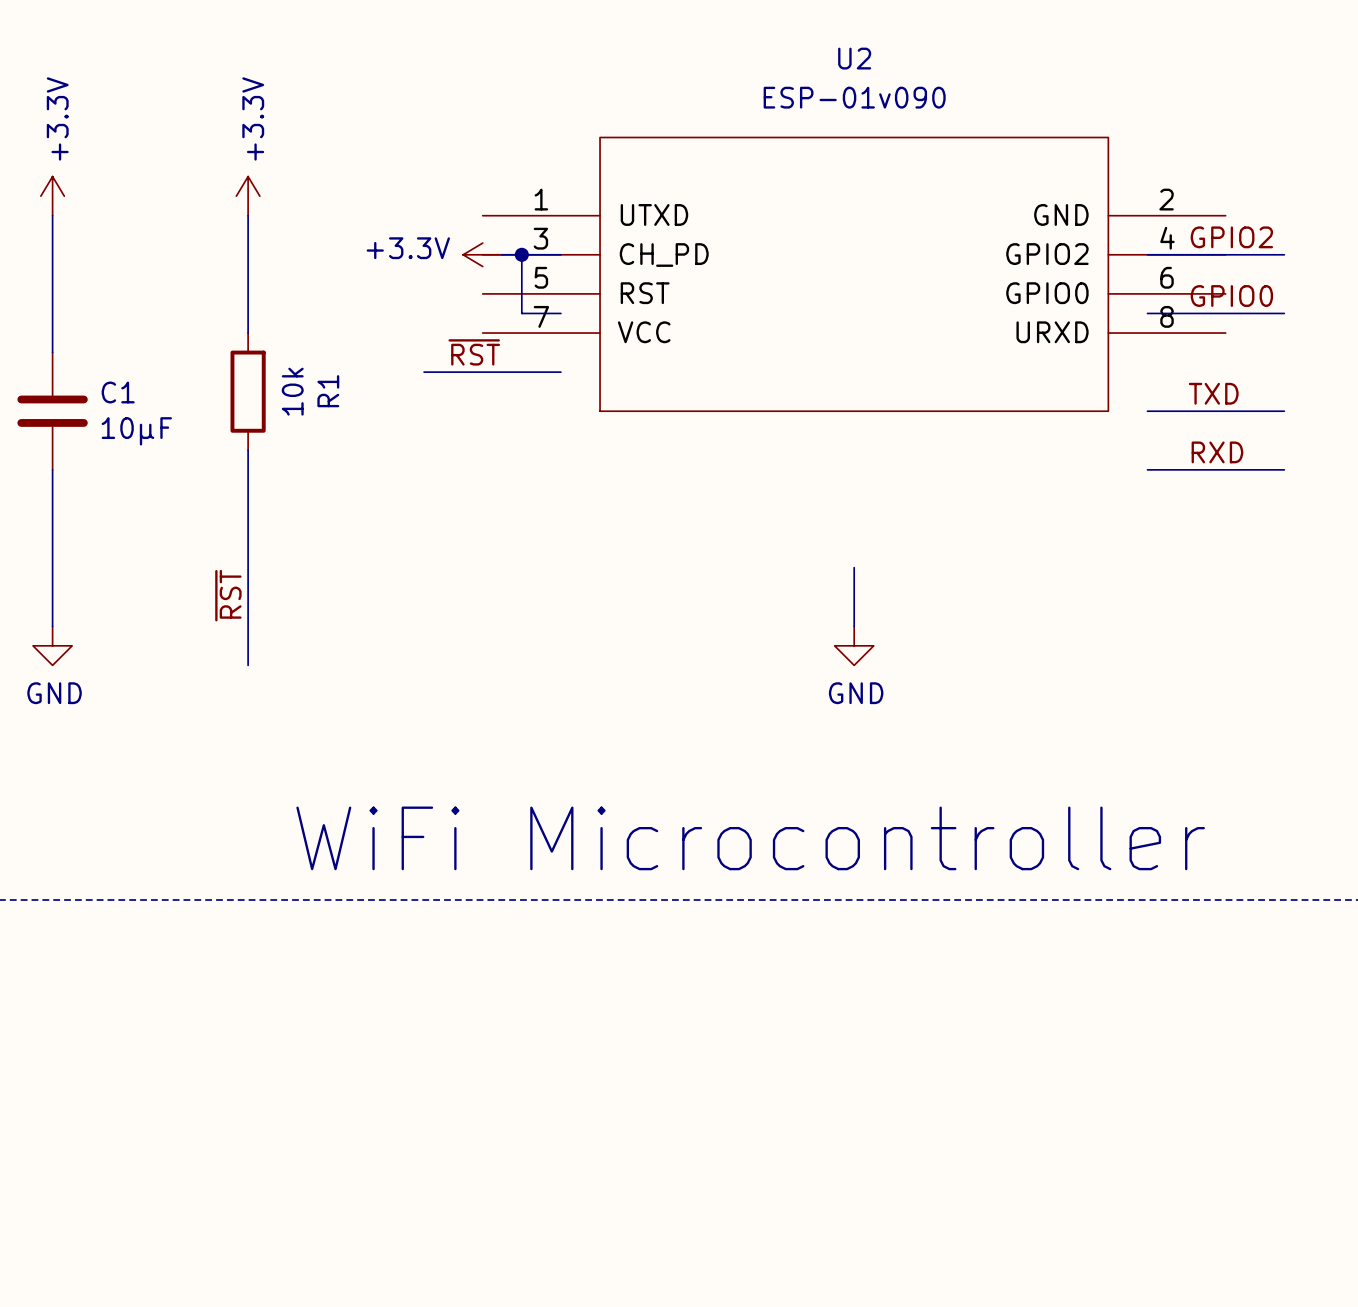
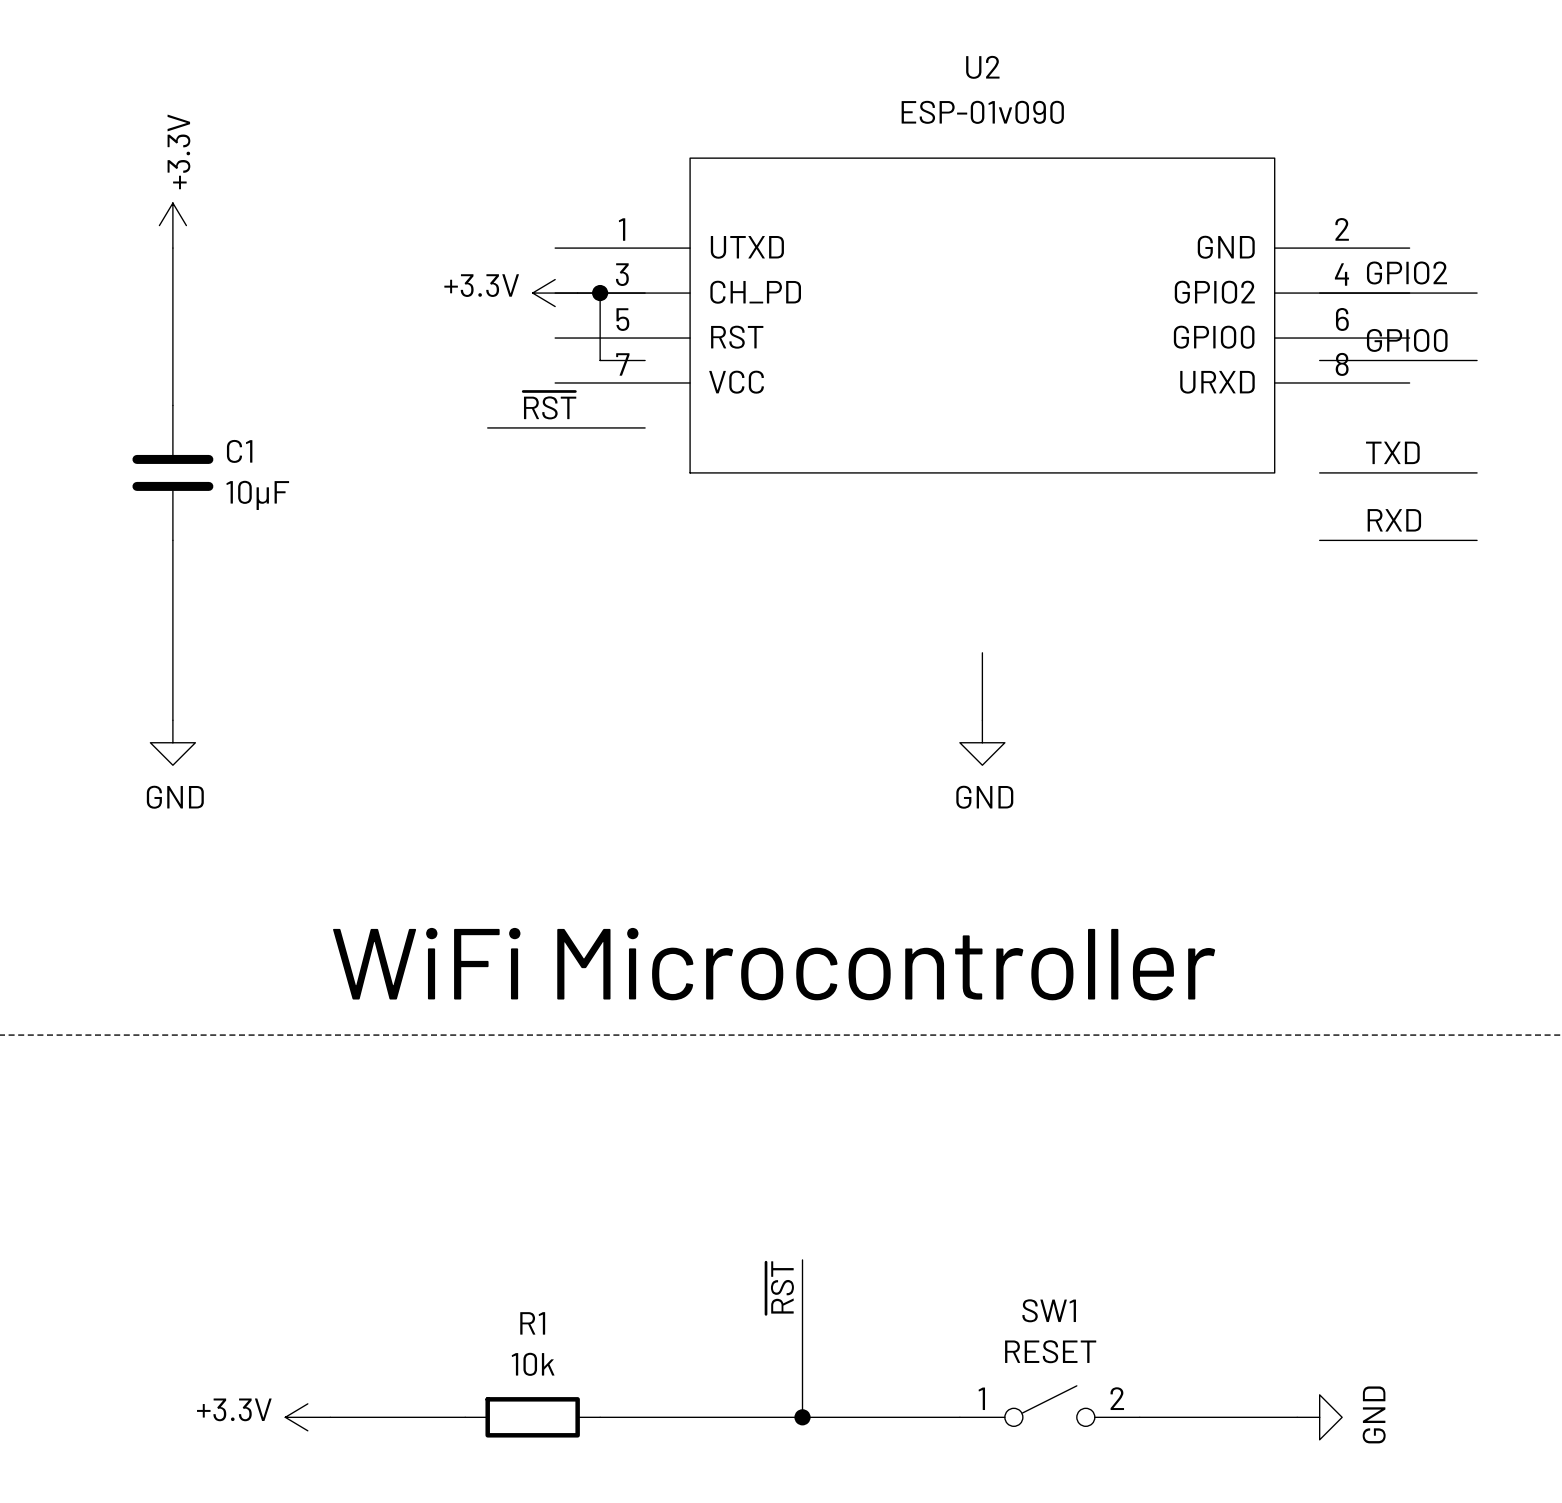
power symbol: +3.3V (52, 196) -> none
power symbol: none -> +3.3V (172, 225)
power symbol: +3.3V (248, 196) -> none
wire: (52, 215) (52, 352) -> (172, 248) (172, 405)
wire: (248, 215) (248, 333) -> none
R1 rotation: 0° (248, 391) -> 90° clockwise (532, 1417)
R1 position: (248, 391) -> (532, 1417)
R1 value position: 10k (292, 391) -> 10k (533, 1364)
R1 name position: R1 (328, 391) -> R1 (532, 1323)
C1 position: (52, 411) -> (172, 472)
wire: (248, 450) (248, 665) -> none
wire: (52, 469) (52, 626) -> (172, 540) (172, 720)
label: ~{RST} (228, 595) -> none
power symbol position: GND (52, 645) -> GND (172, 742)
wire: none -> (802, 1259) (802, 1417)
label: none -> ~{RST} (779, 1287)
SW1: none -> RESET (1049, 1406)
power symbol: none -> +3.3V (307, 1417)
wire: none -> (330, 1417) (465, 1417)
wire: none -> (600, 1417) (959, 1417)
junction: none -> (802, 1417)
wire: none -> (1139, 1417) (1297, 1417)
power symbol: none -> GND (1319, 1417)

